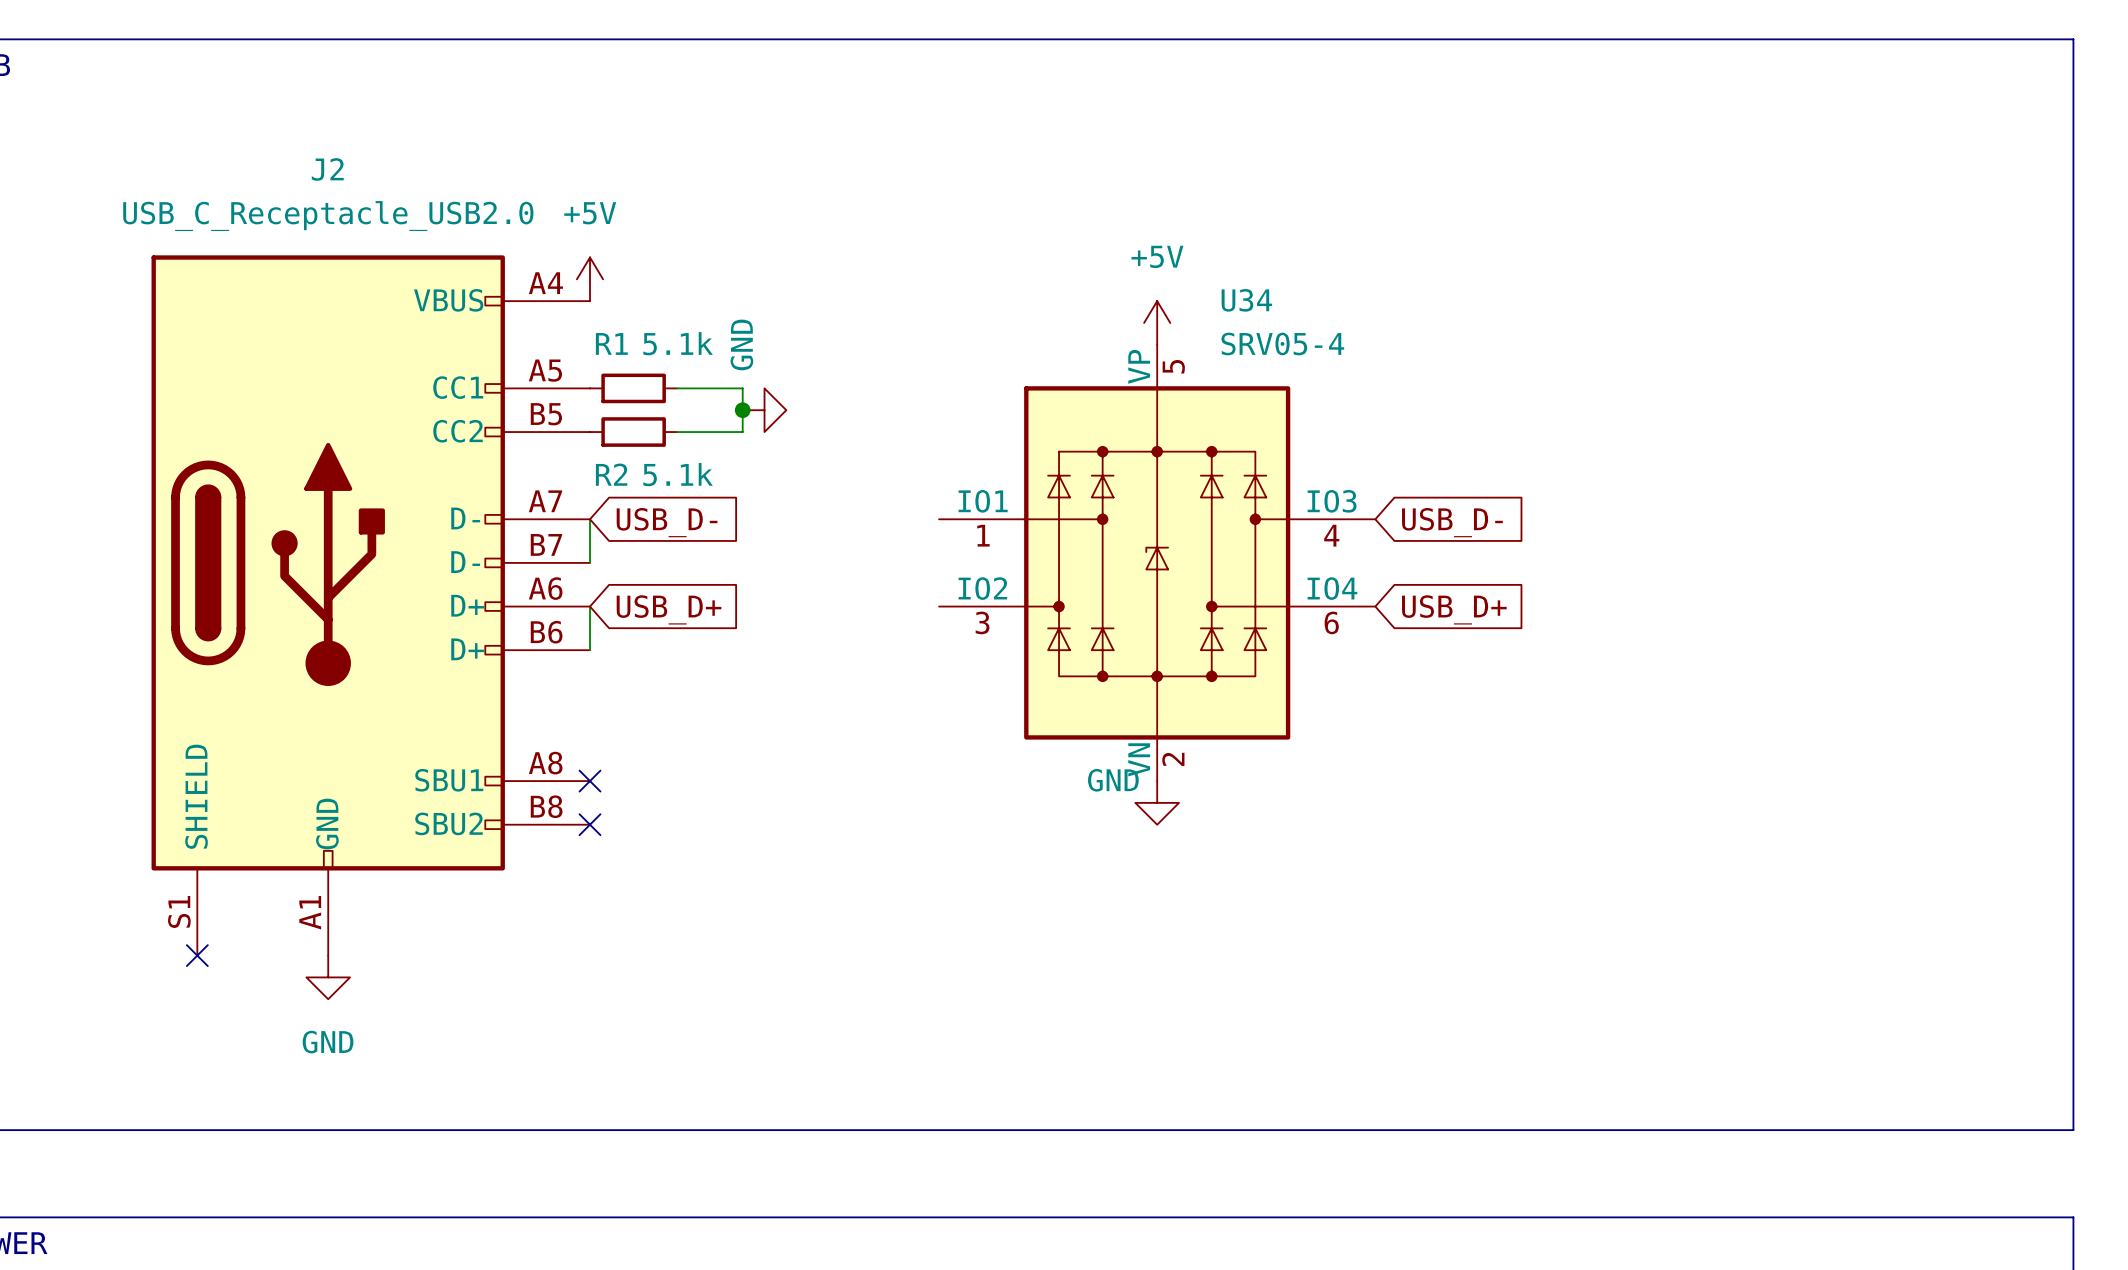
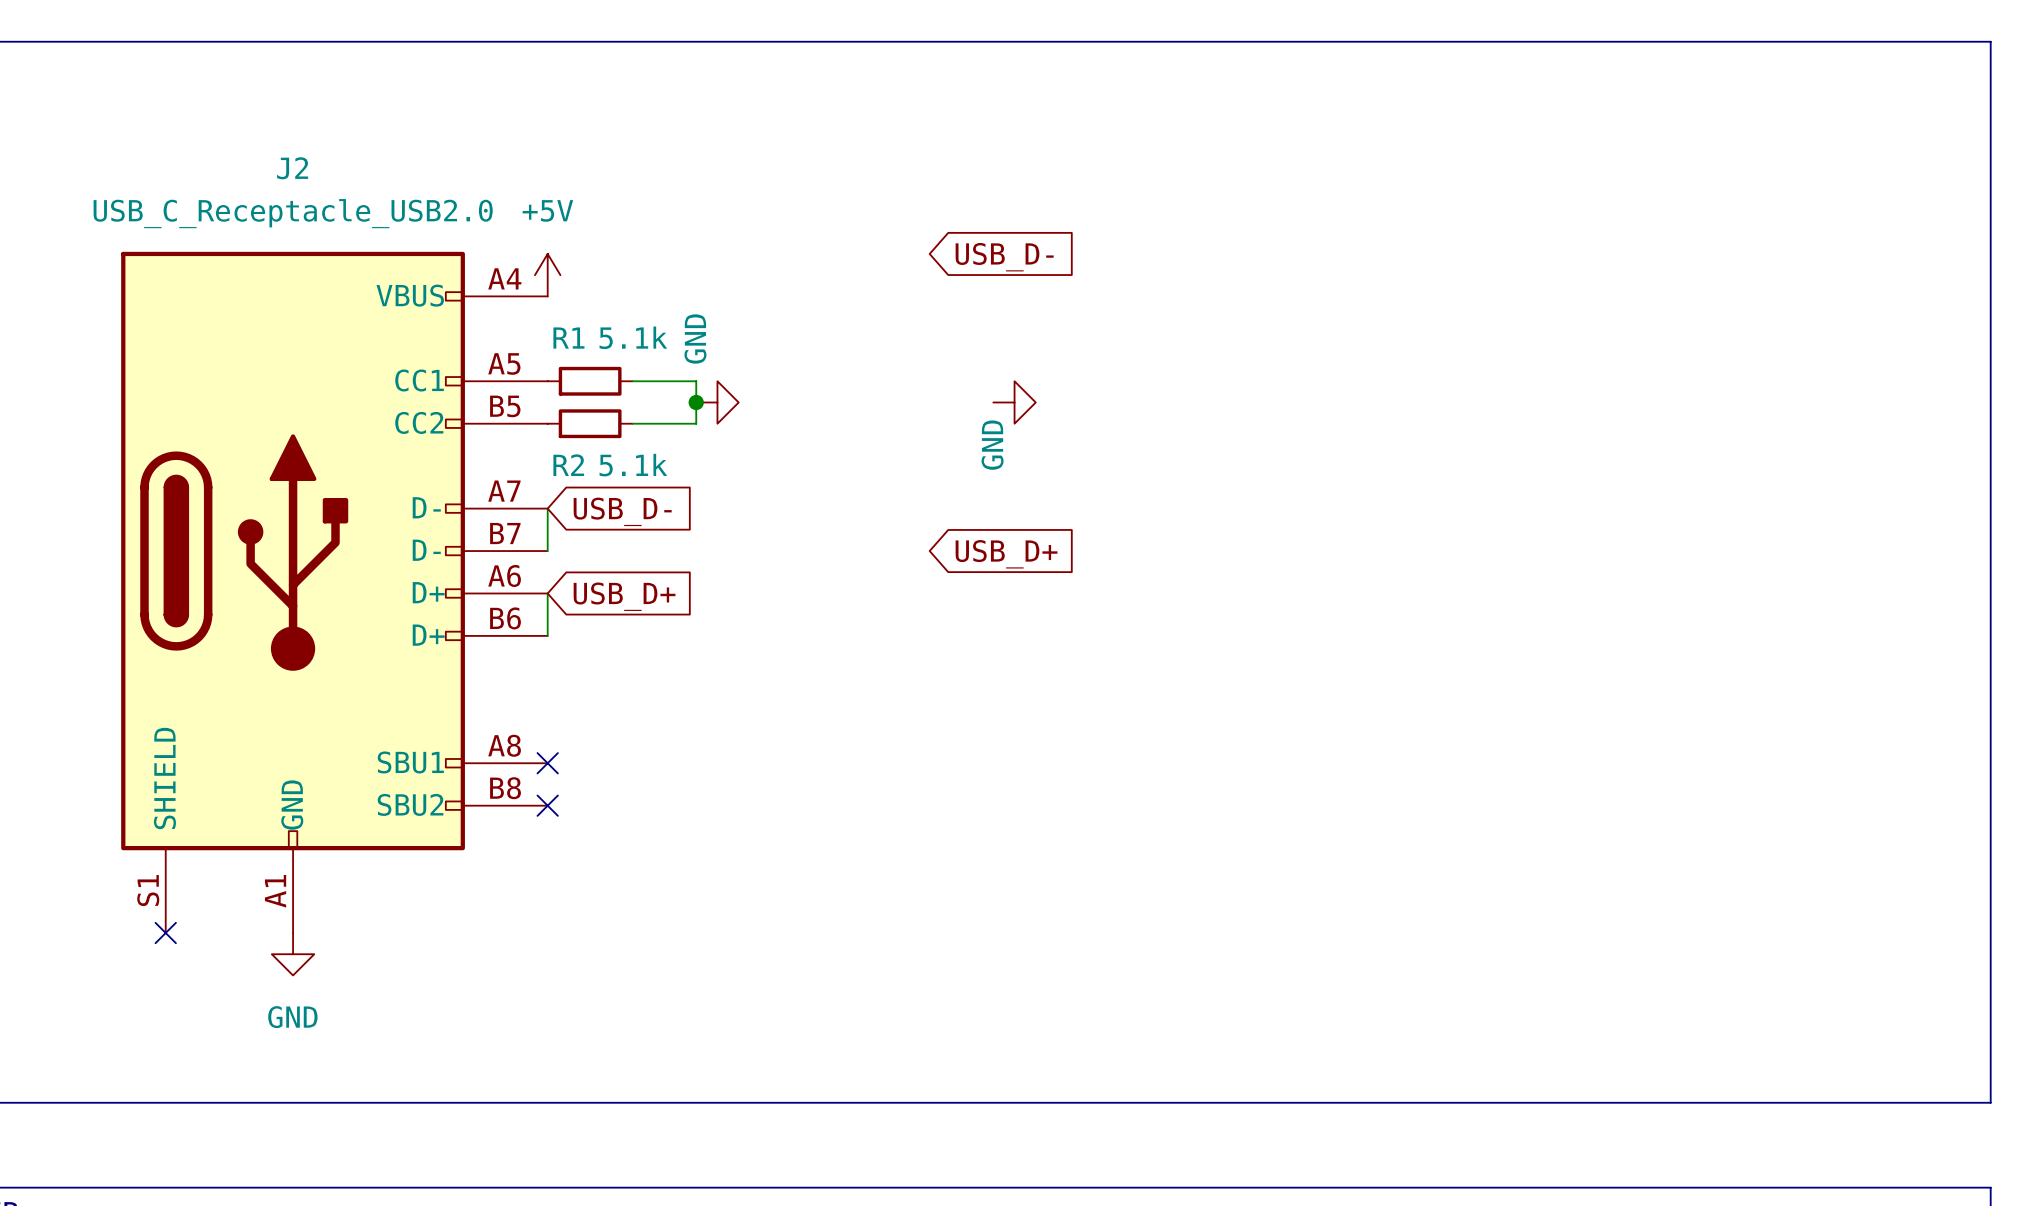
global label: none -> USB_D- (1004, 257)
power symbol: +5V (1157, 322) -> none
global label: USB_D- (1452, 522) -> none
U34: SRV05-4 (1157, 562) -> none
global label position: USB_D+ (1454, 609) -> USB_D+ (1006, 554)
power symbol rotation: 0° (1157, 802) -> 90° counterclockwise (1014, 402)
power symbol position: GND (1157, 802) -> GND (1014, 402)

